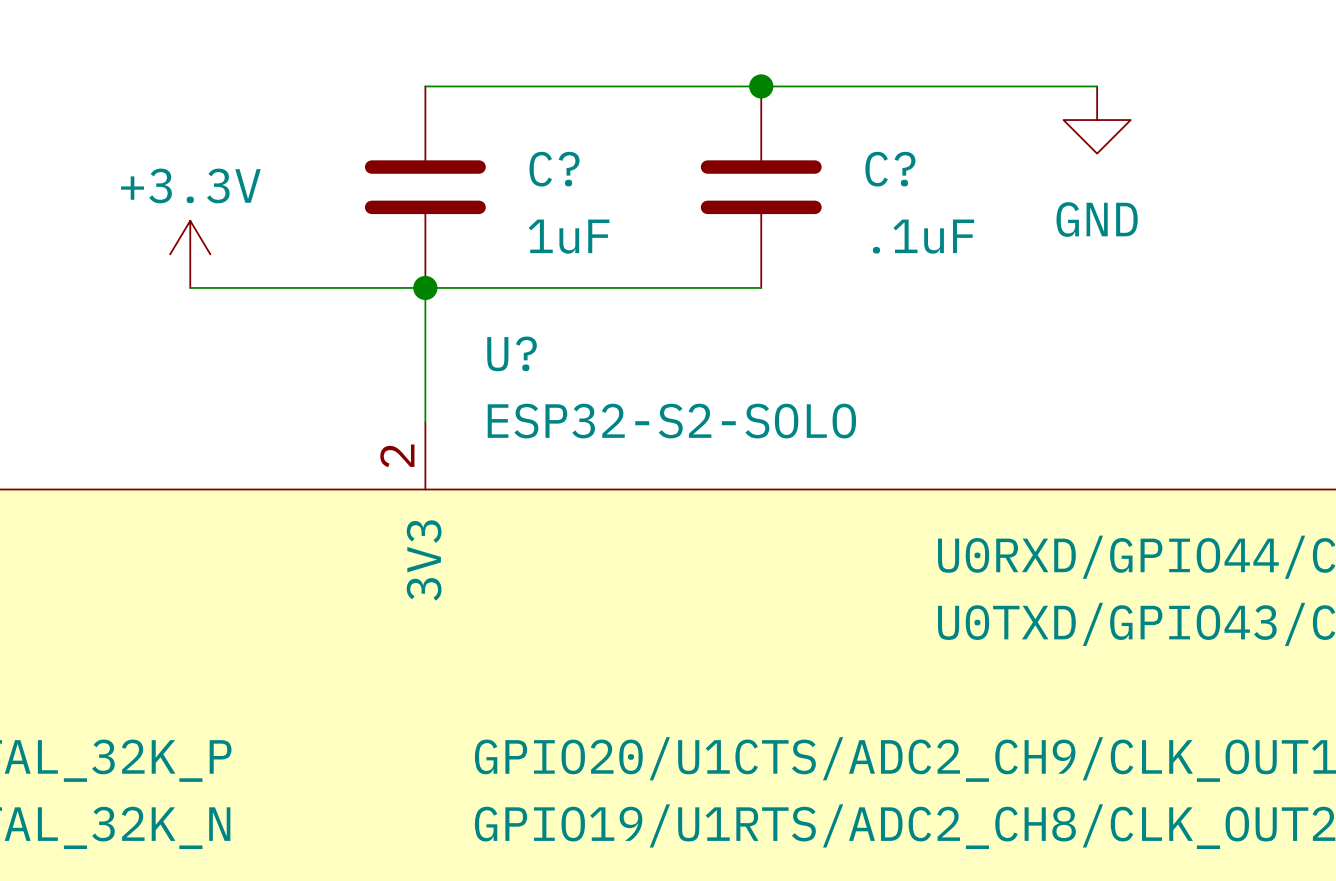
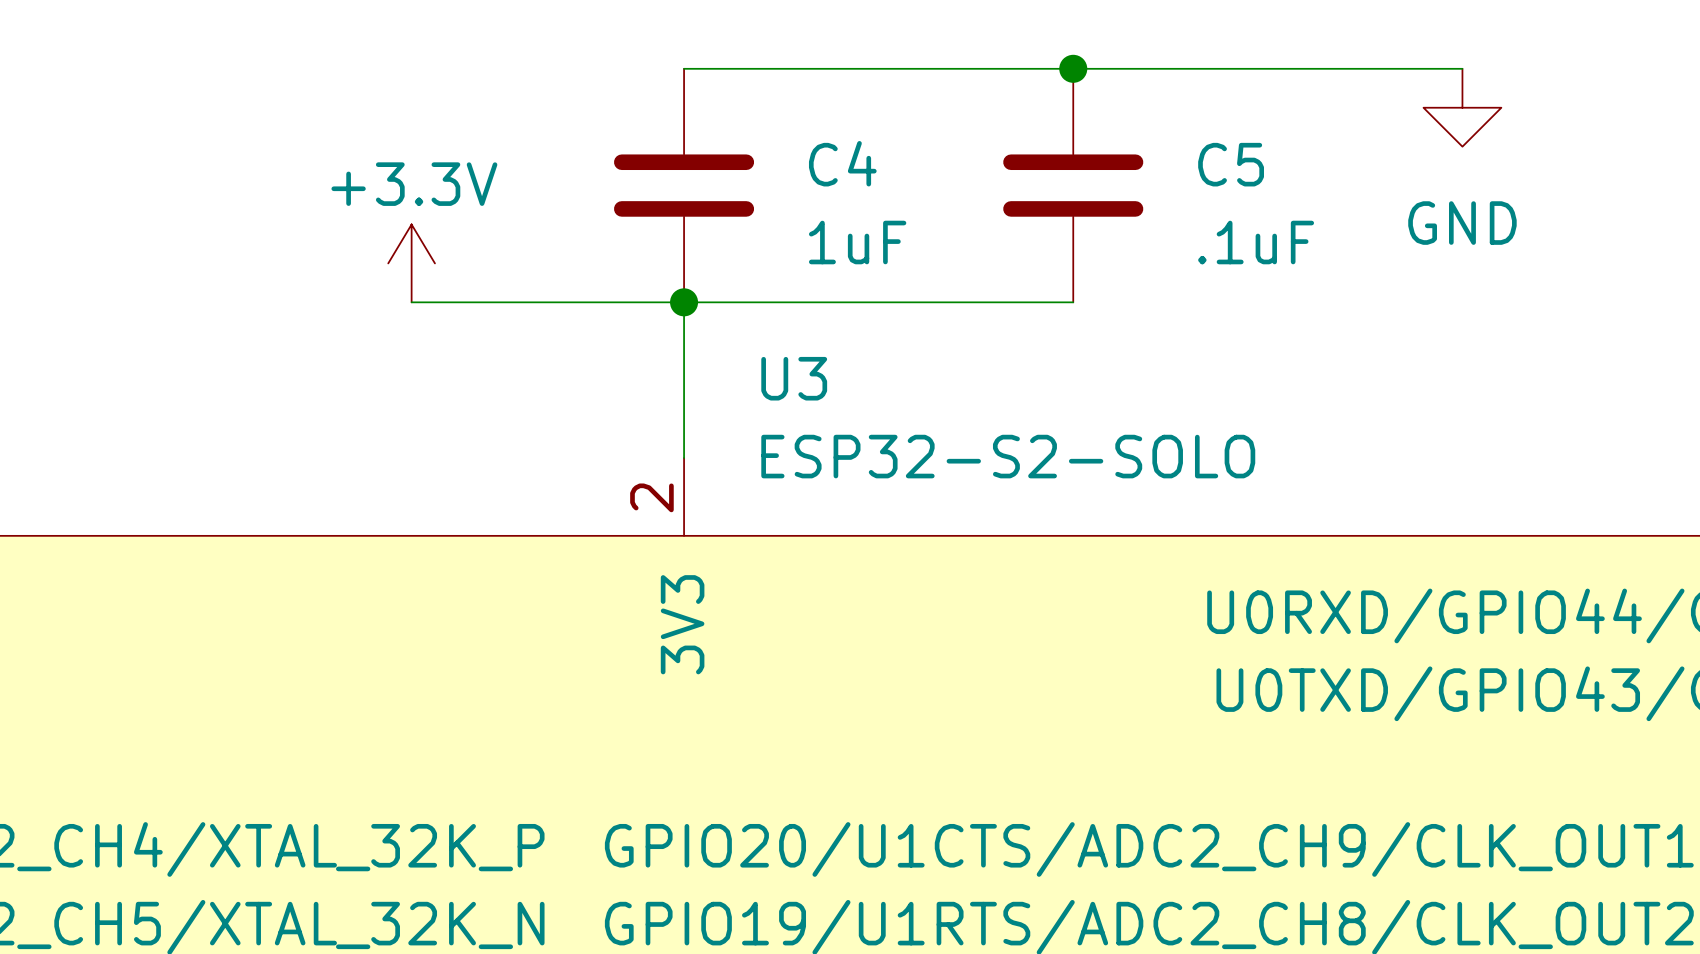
C? name: C? (554, 169) -> C4 (842, 163)
C? name: C? (890, 169) -> C5 (1231, 164)
U? name: U? (512, 353) -> U3 (794, 378)

